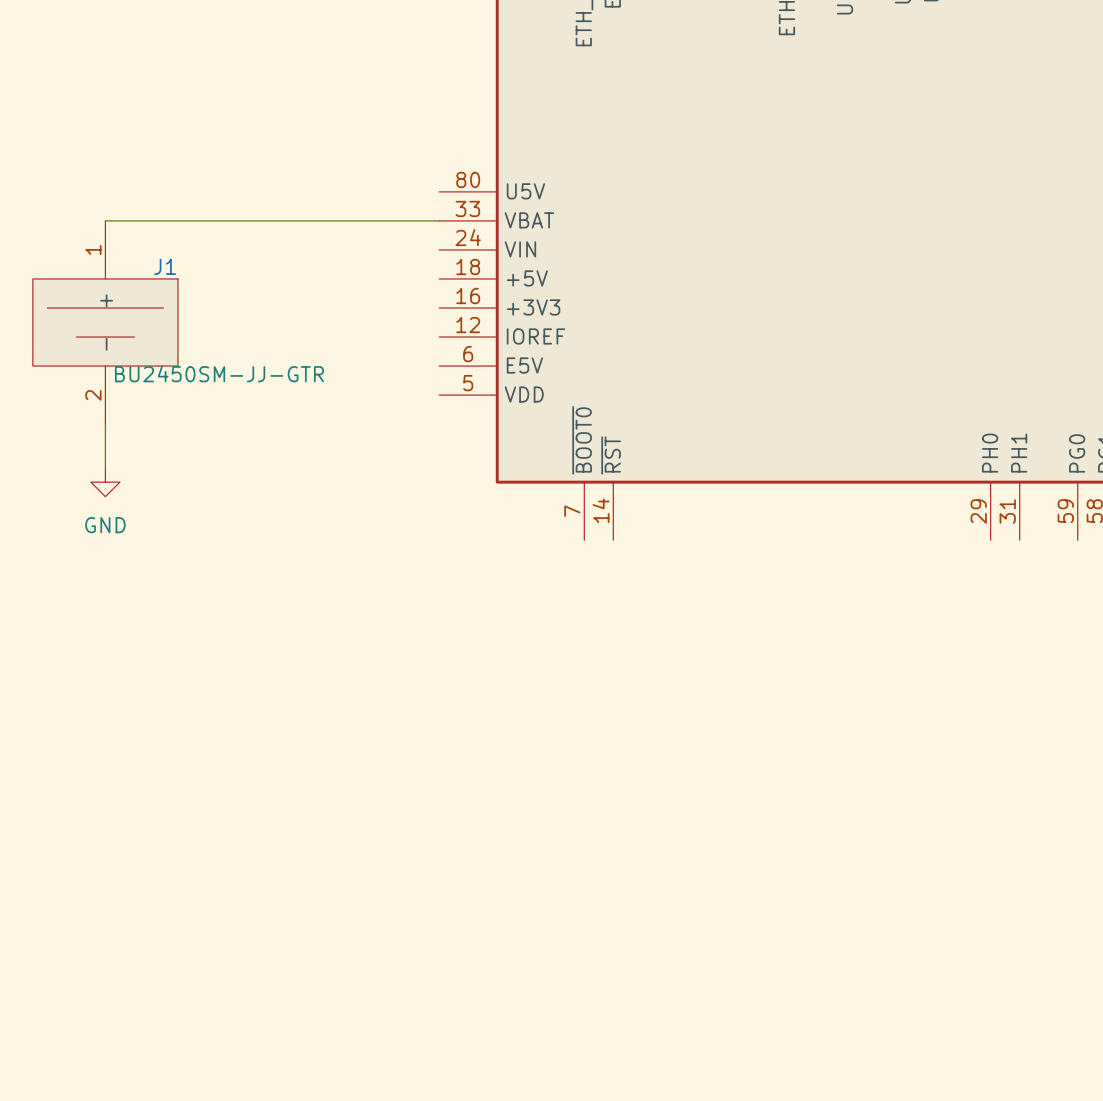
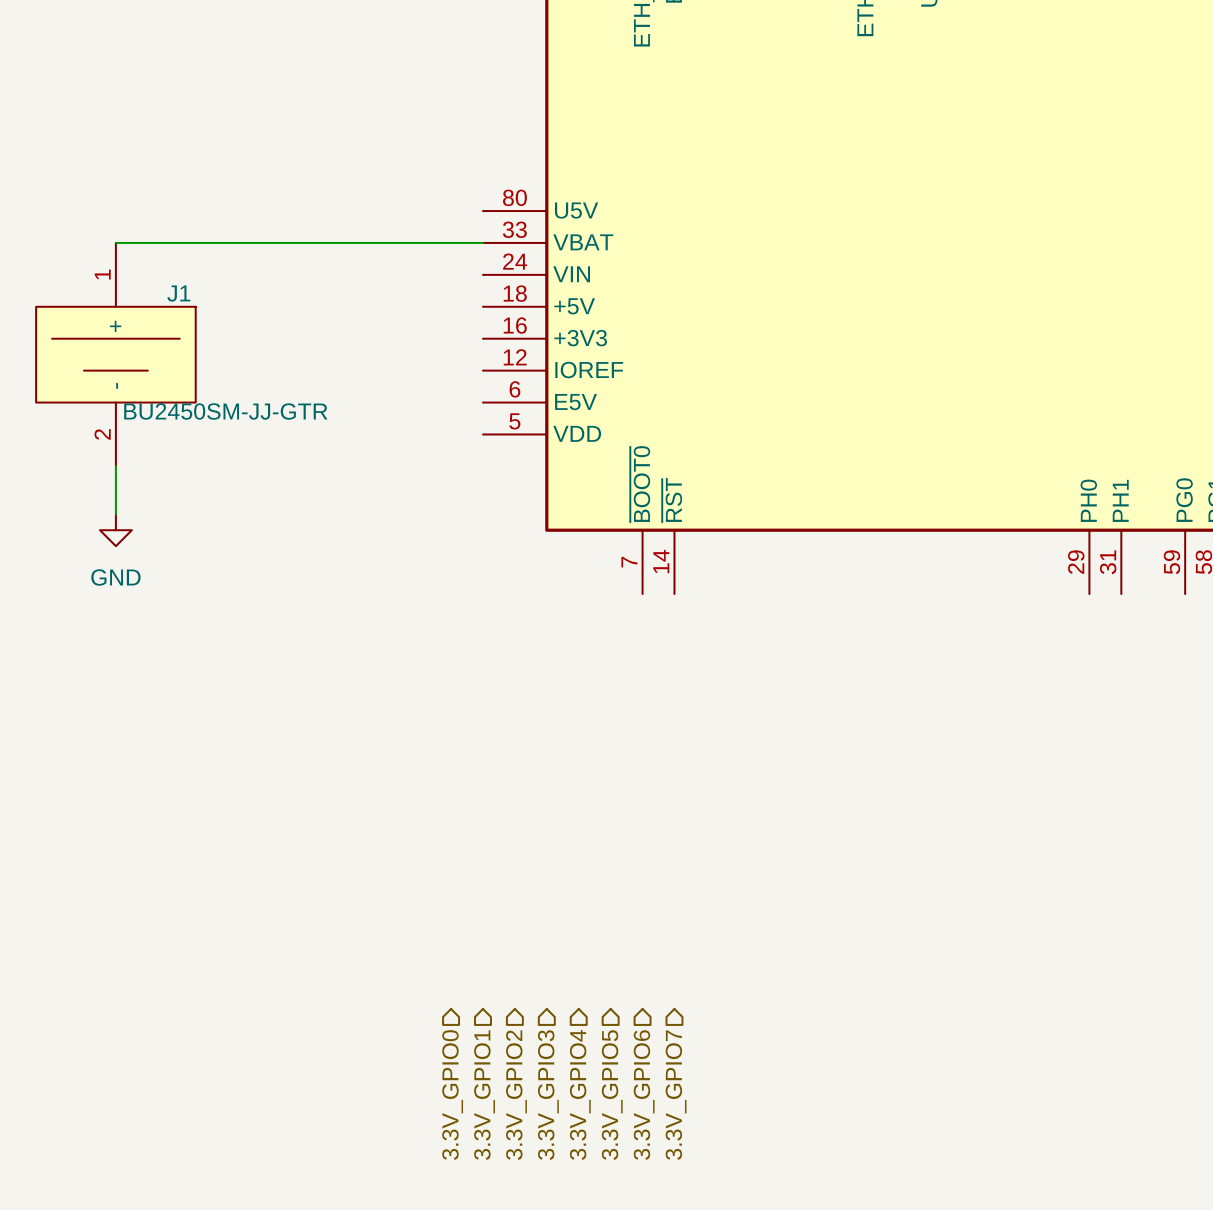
hierarchical label: none -> 3.3V_GPIO0 (452, 1095)
hierarchical label: none -> 3.3V_GPIO1 (484, 1095)
hierarchical label: none -> 3.3V_GPIO2 (516, 1095)
hierarchical label: none -> 3.3V_GPIO3 (548, 1095)
hierarchical label: none -> 3.3V_GPIO4 (580, 1094)
hierarchical label: none -> 3.3V_GPIO5 (612, 1095)
hierarchical label: none -> 3.3V_GPIO6 (644, 1095)
hierarchical label: none -> 3.3V_GPIO7 (676, 1095)

